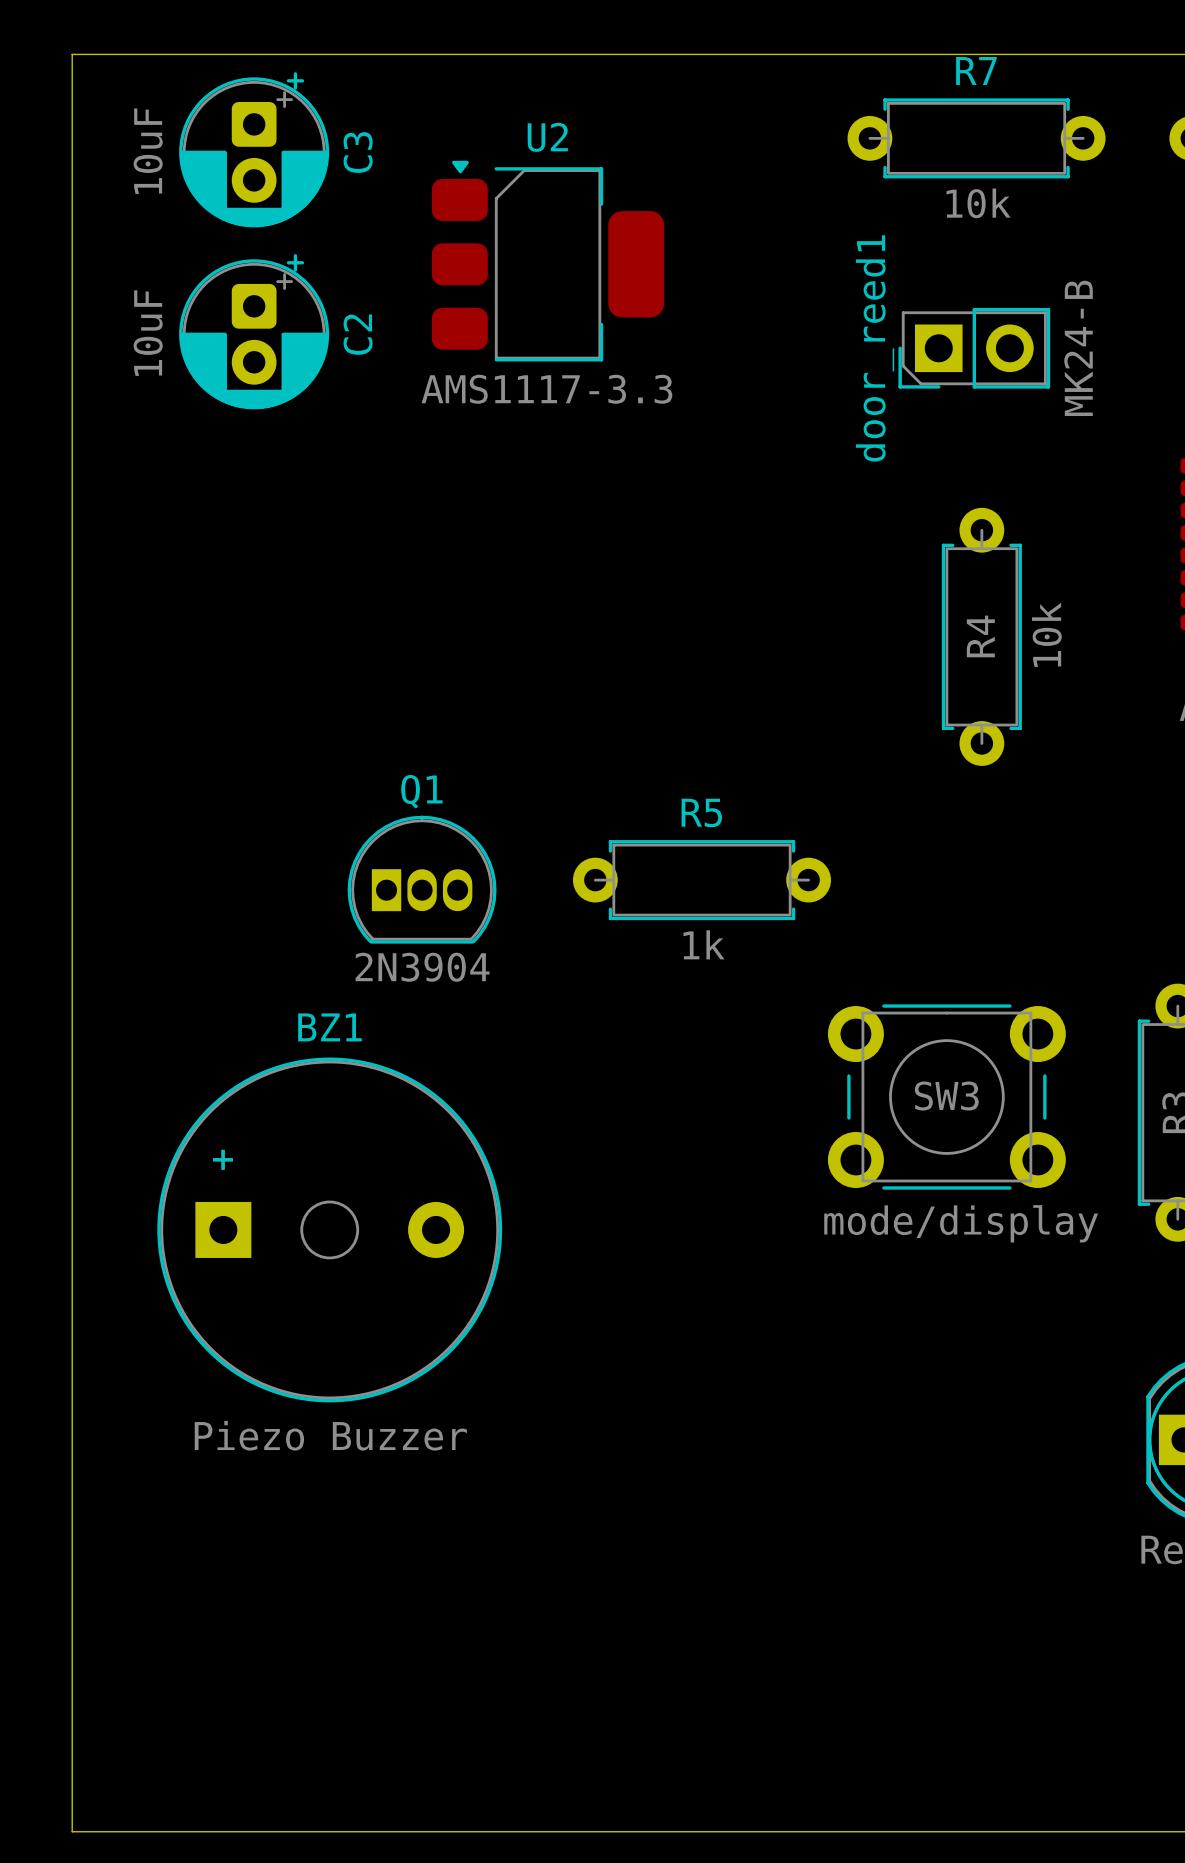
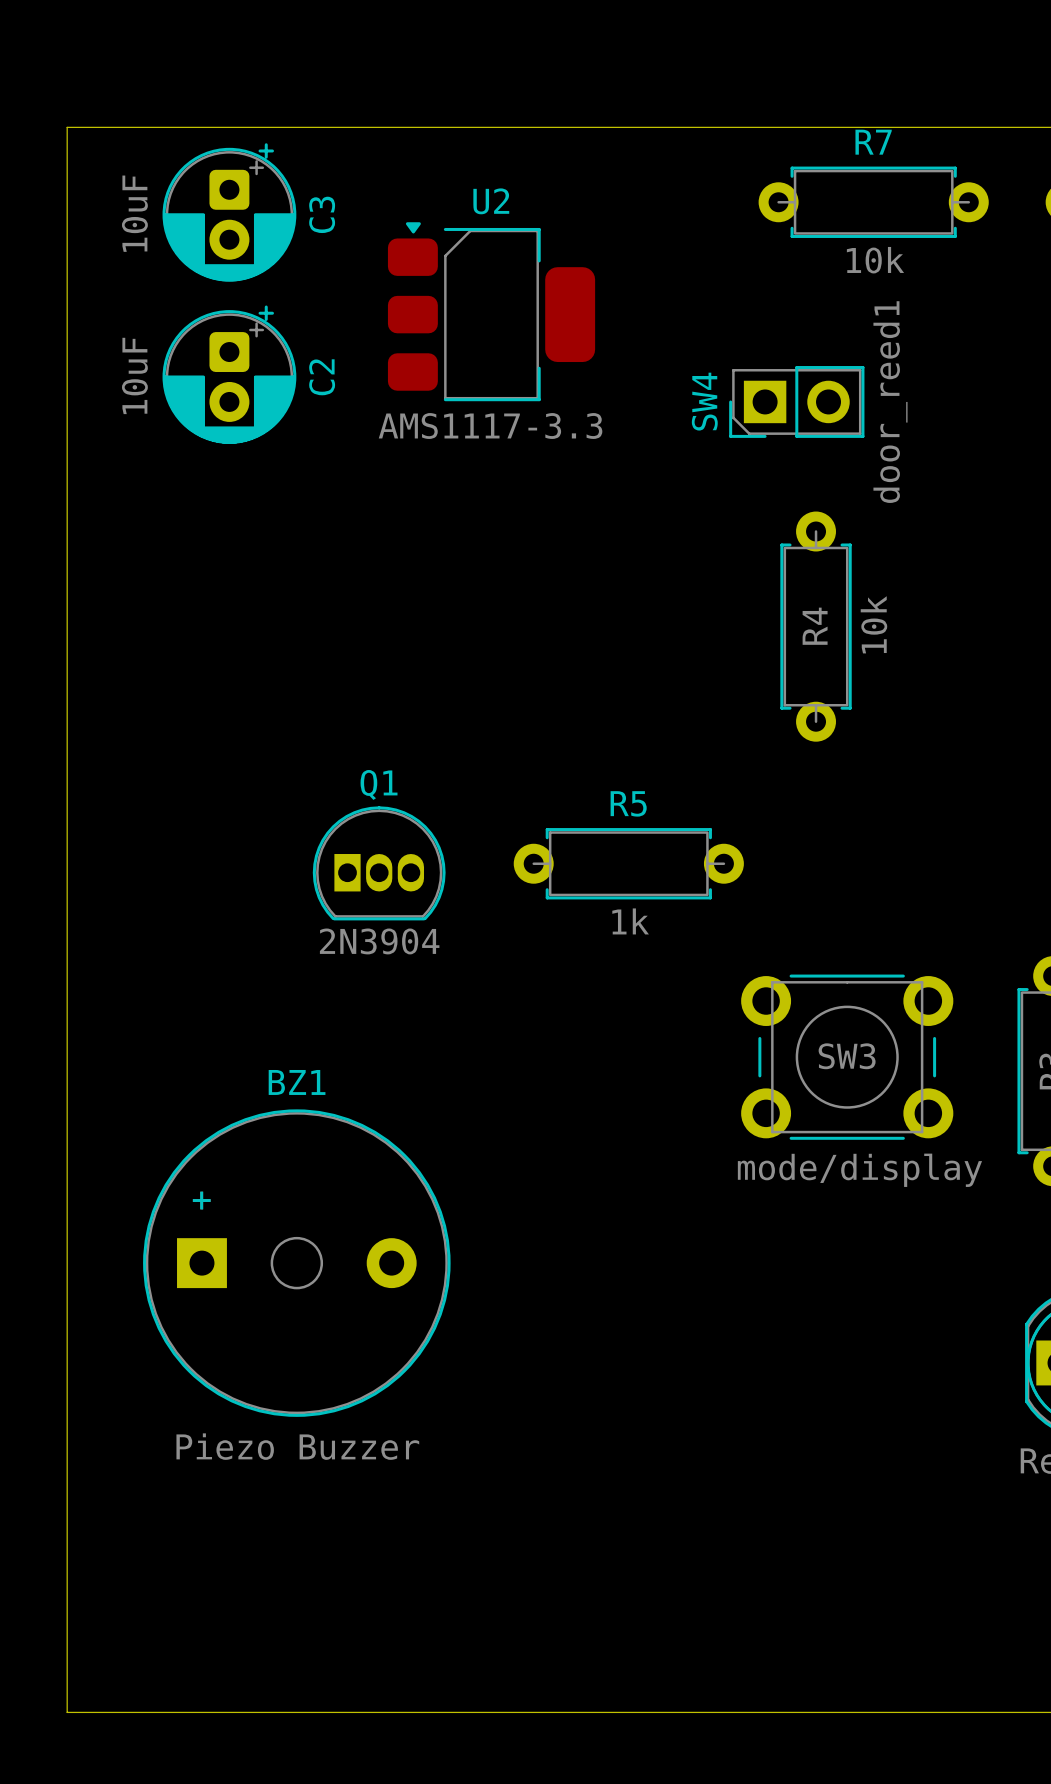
door_reed1: MK24-B (974, 348) -> none
SW4: none -> door_reed1 (796, 401)
R4 position: (981, 636) -> (816, 626)
BZ1 position: (329, 1229) -> (296, 1263)

